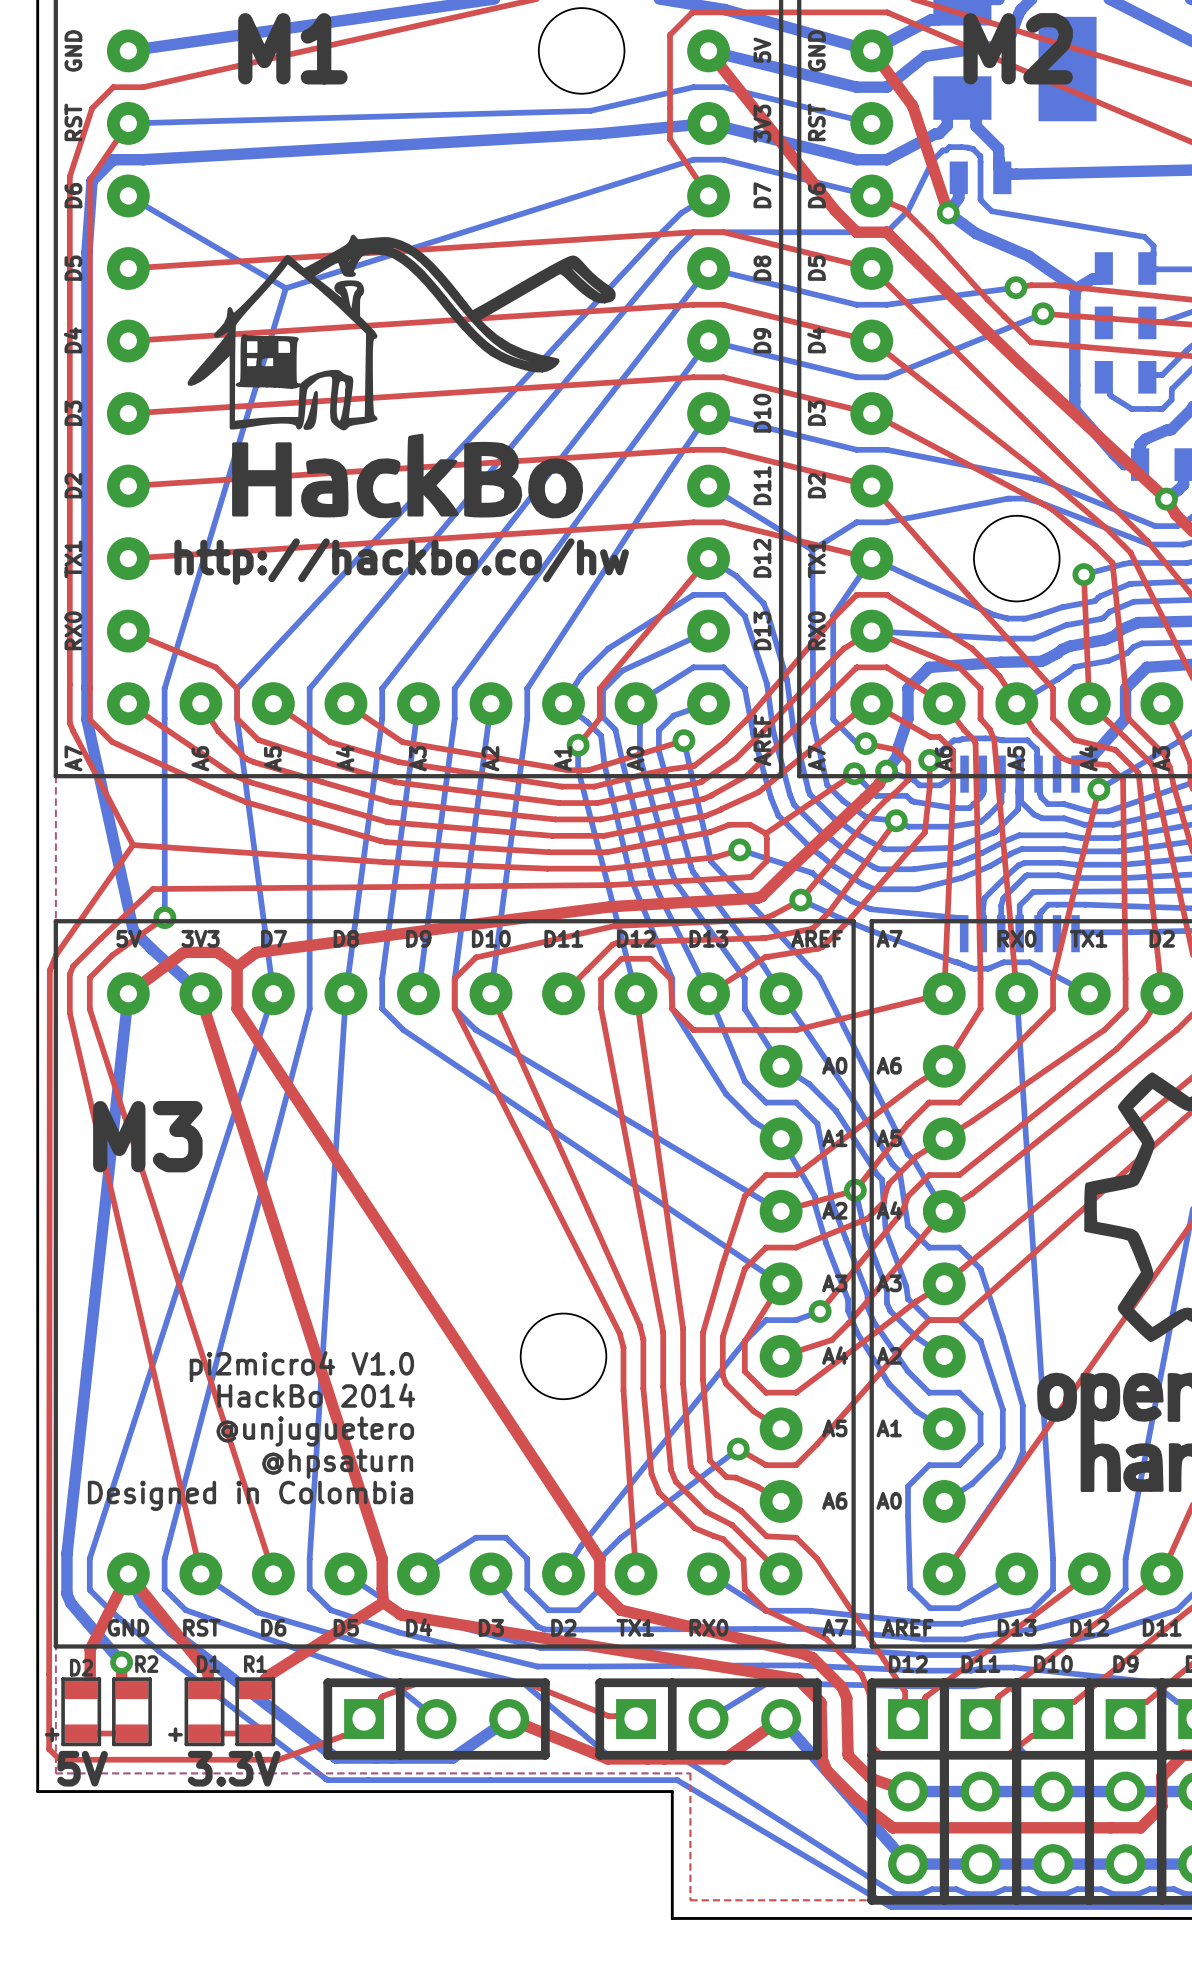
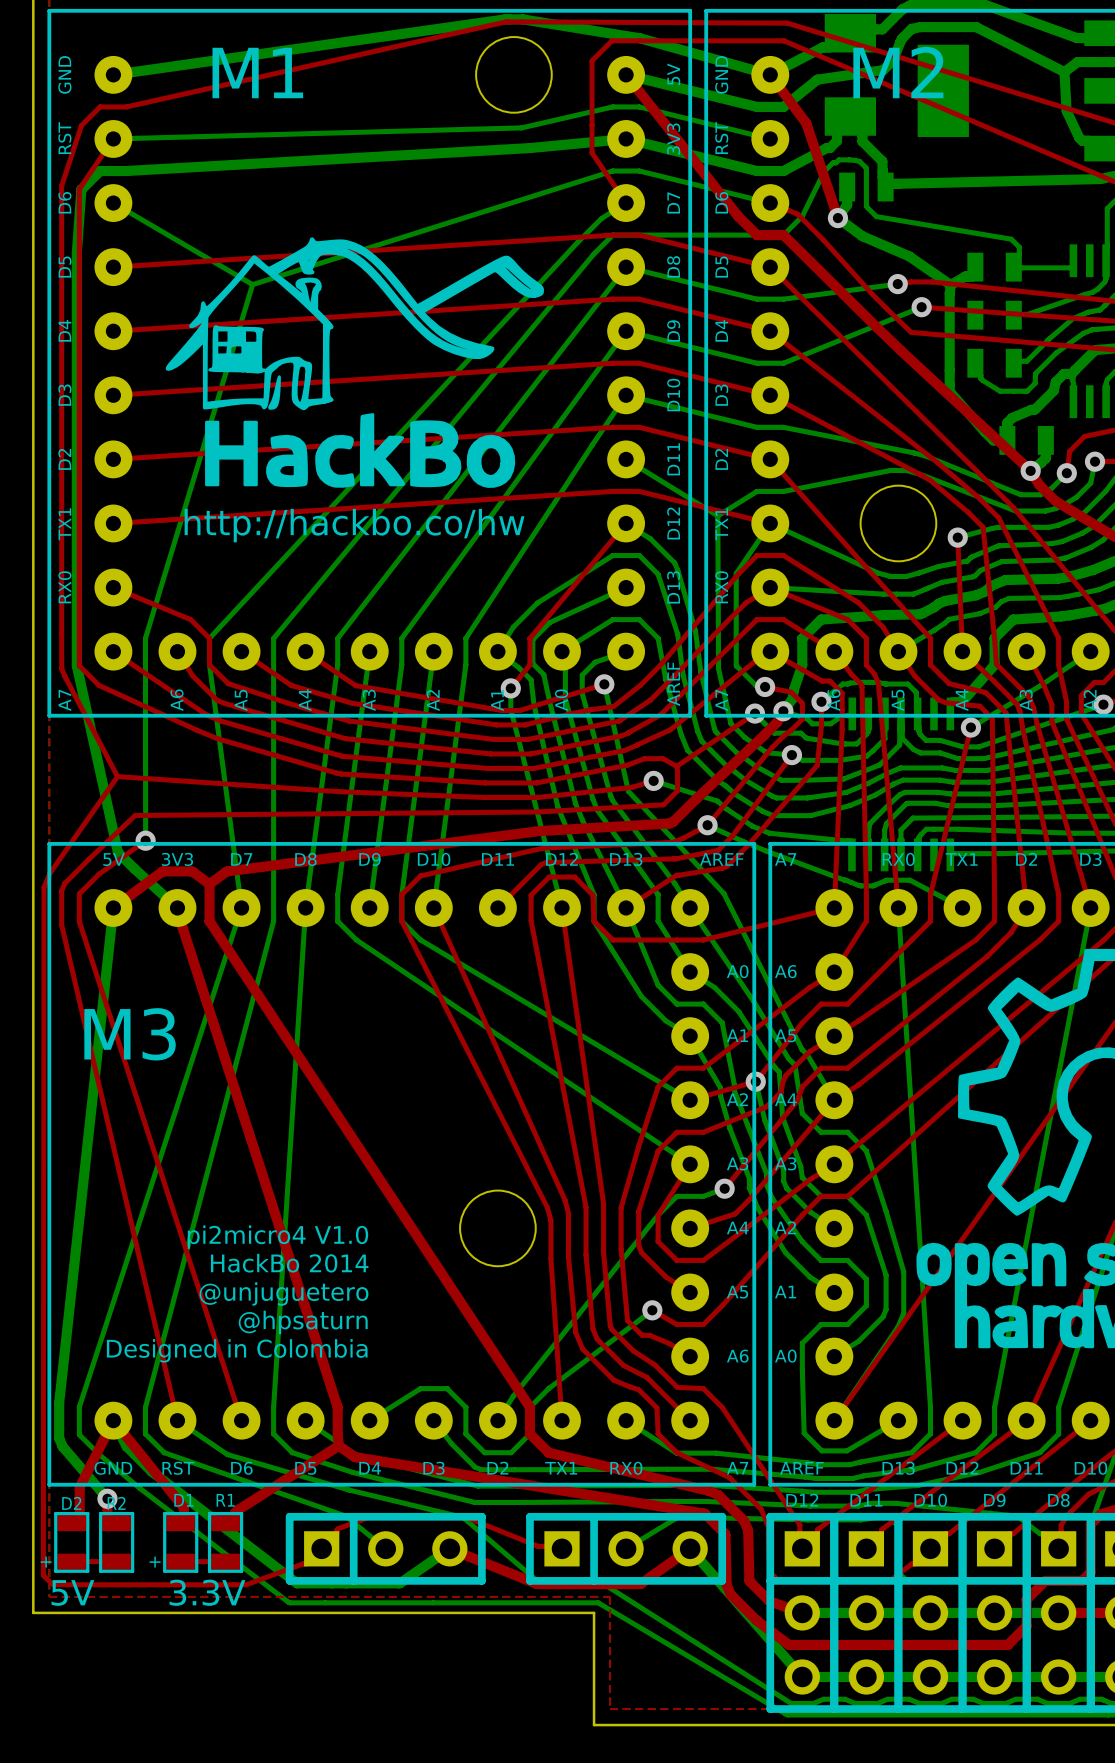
R2 name position: R2 (146, 1664) -> R2 (116, 1503)

